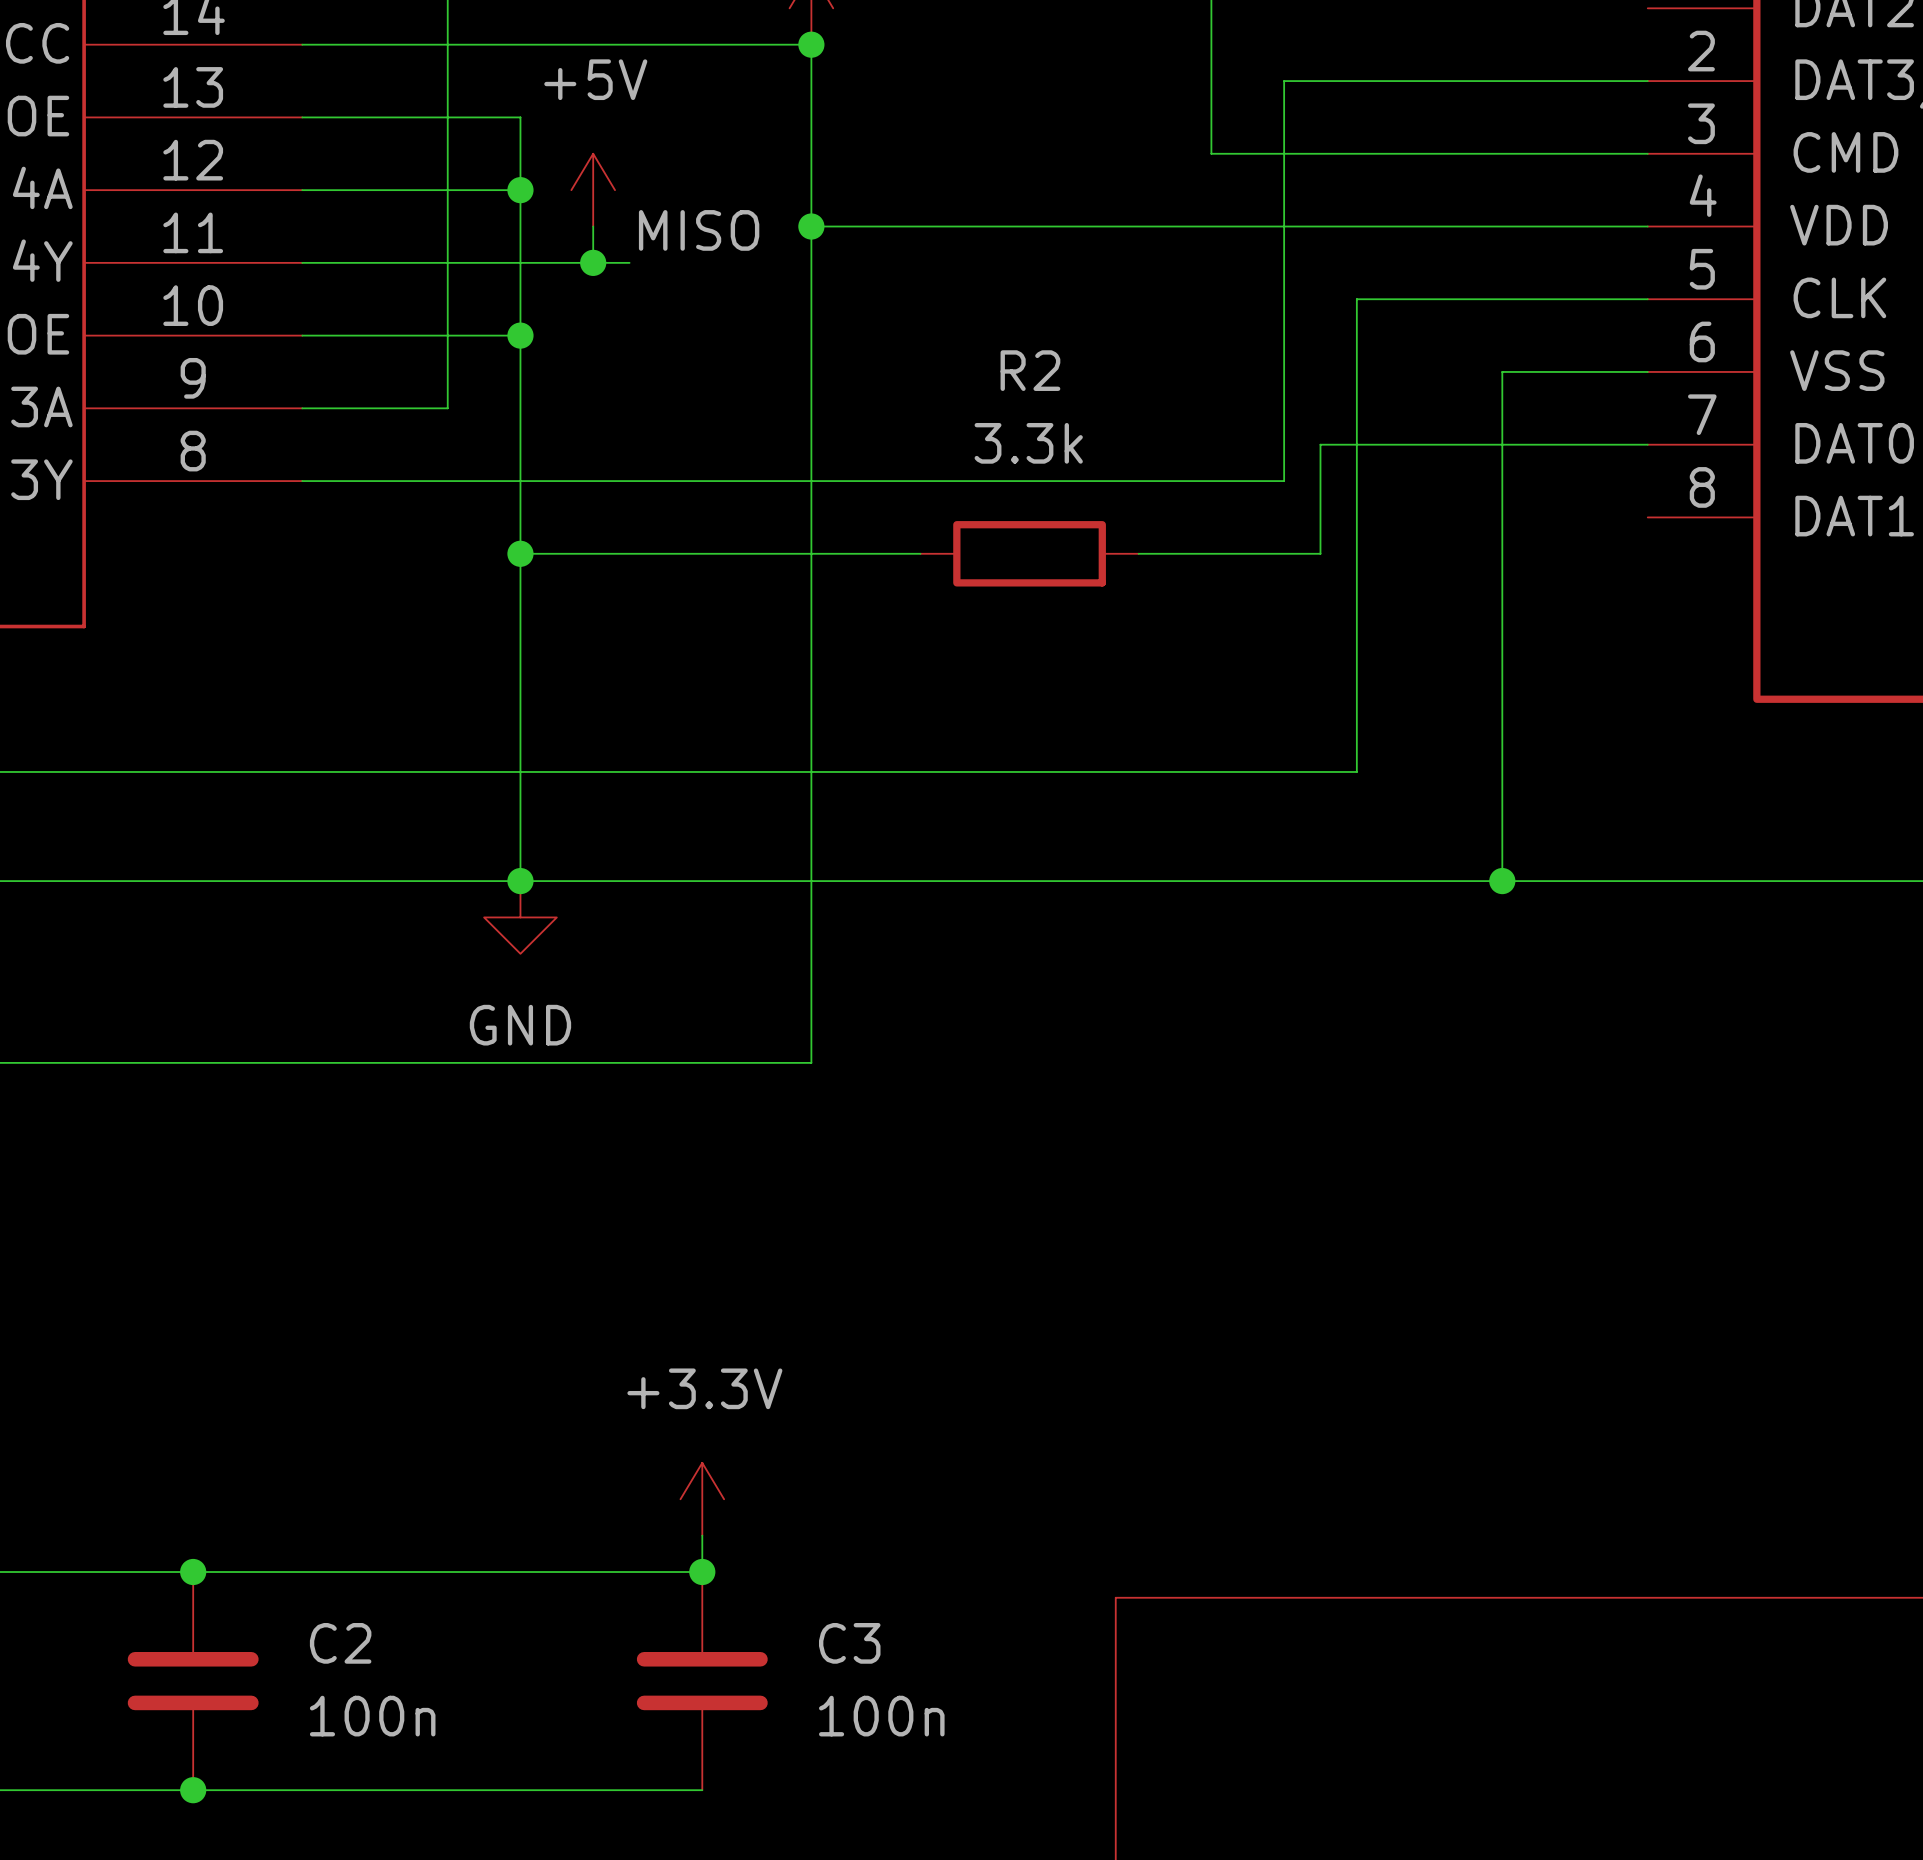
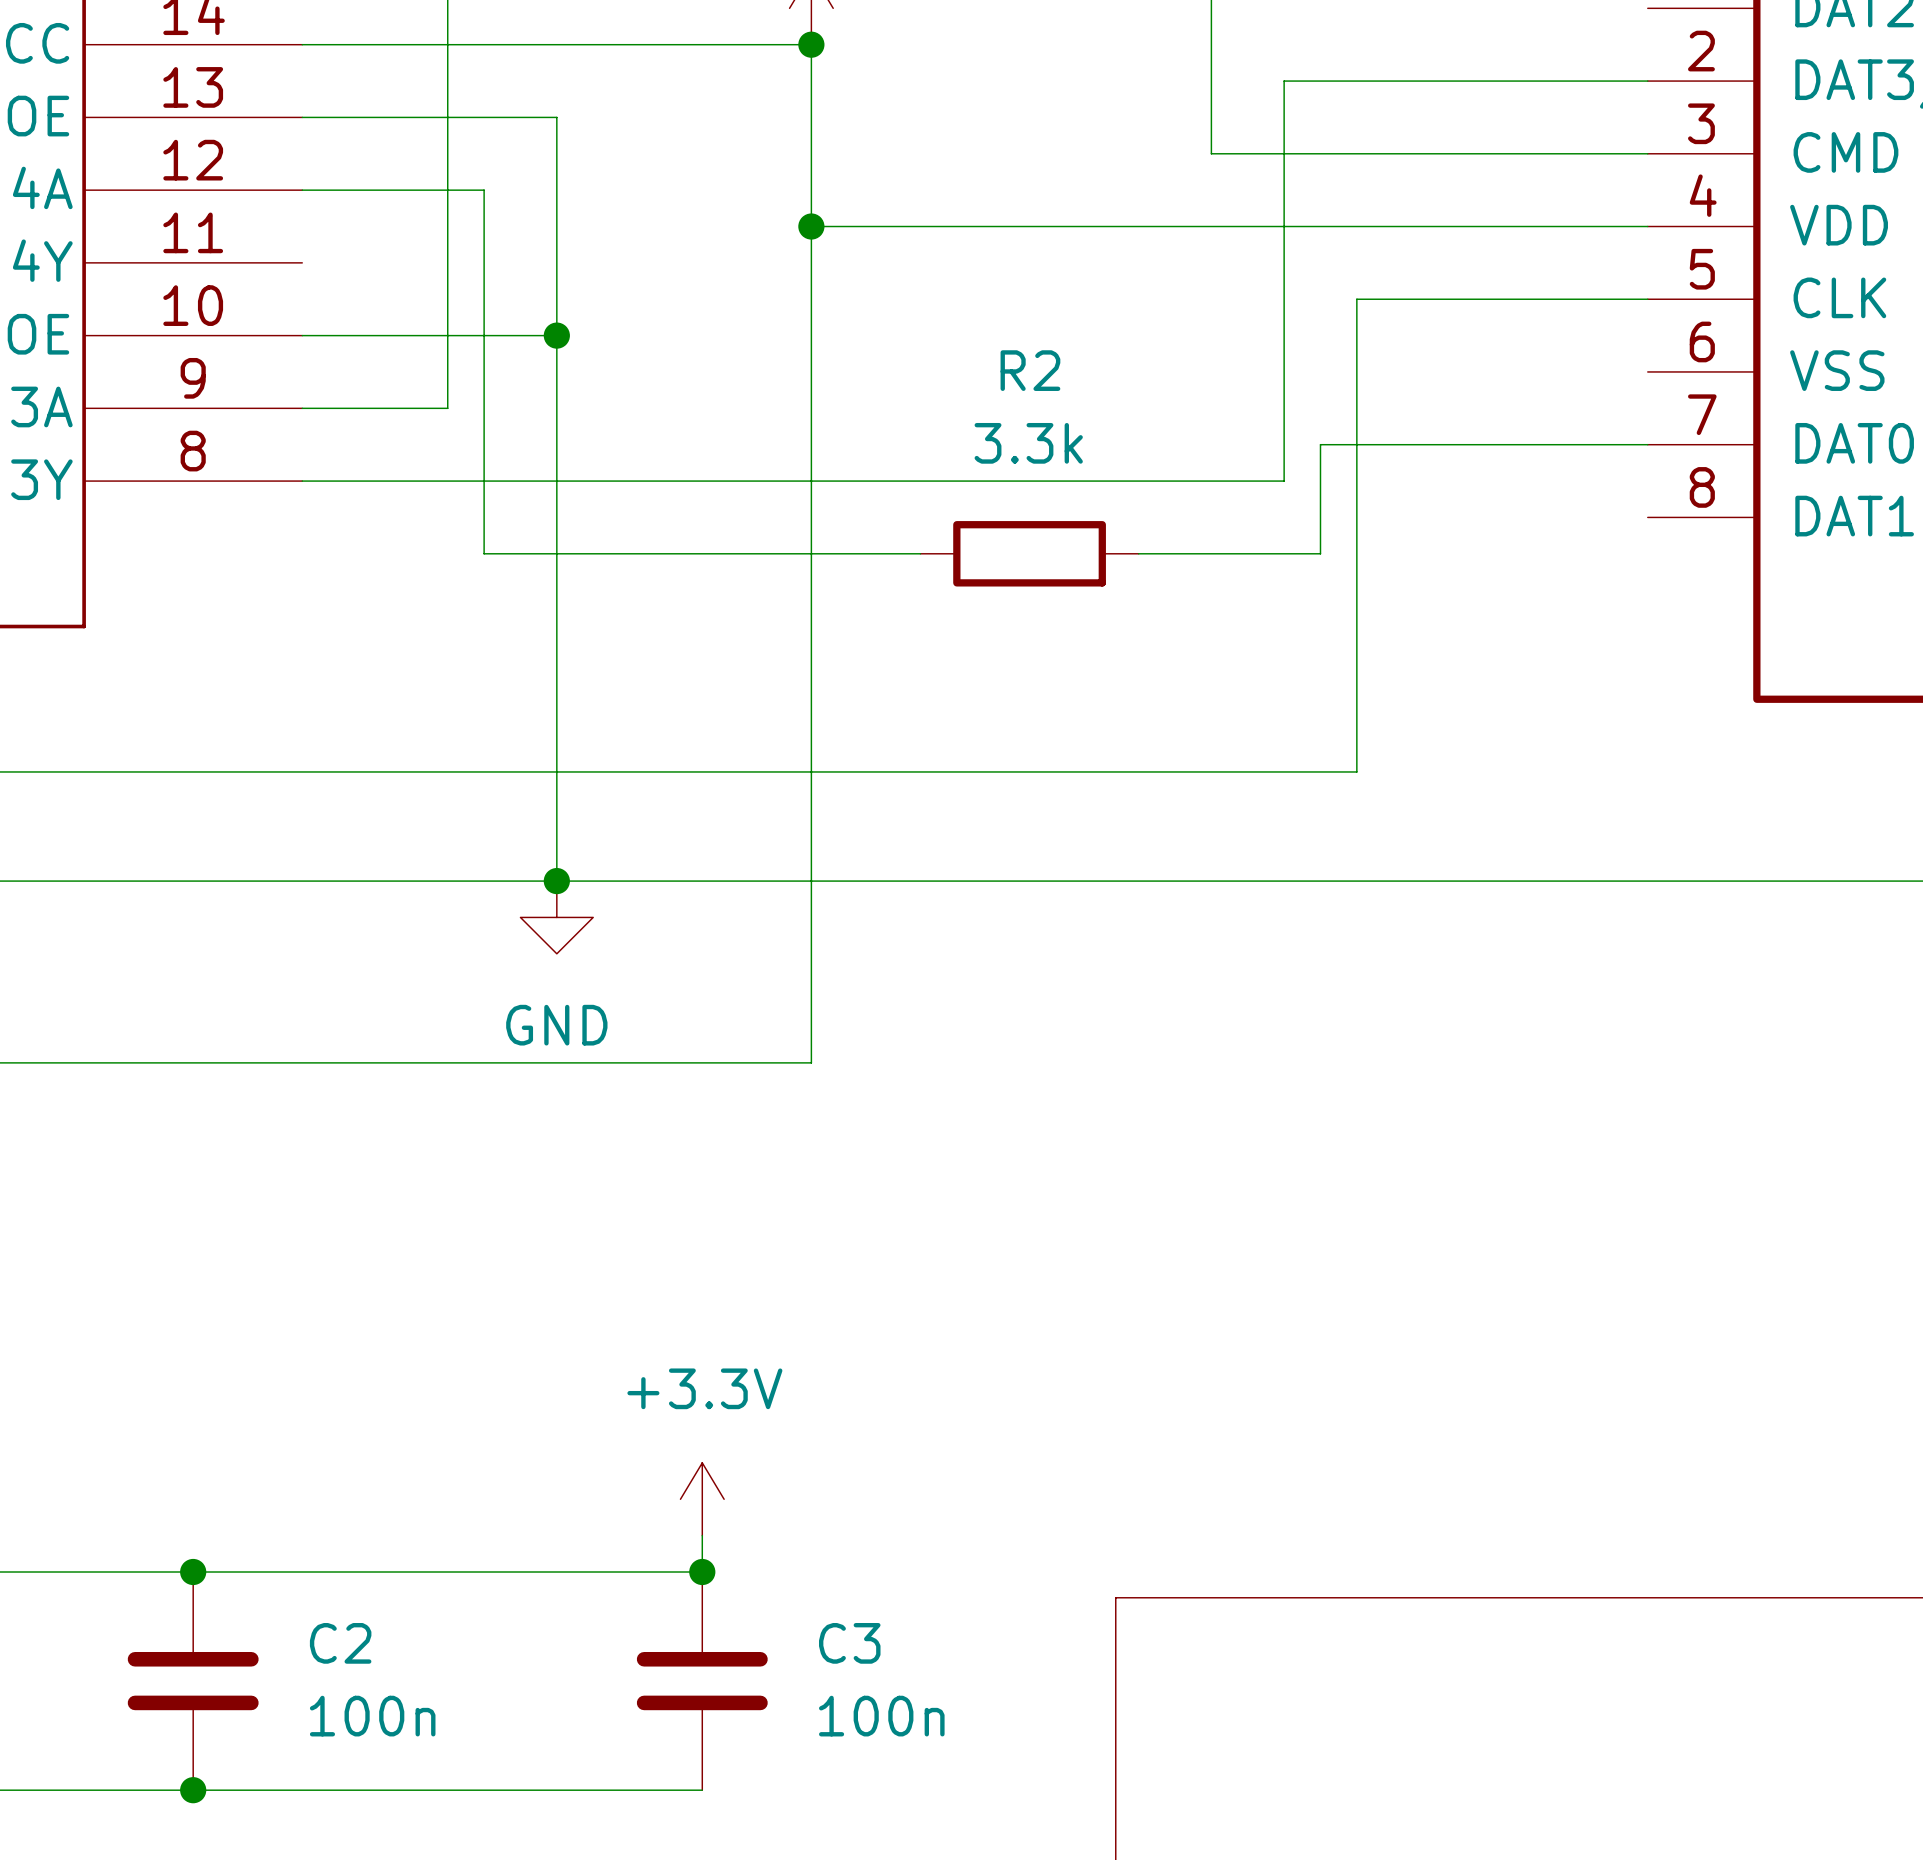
wire: (520, 117) (520, 881) -> (520, 117) (556, 117) (556, 881)
wire: (484, 190) (520, 190) -> (484, 190) (484, 553) (520, 553)
junction: (520, 190) -> none
power symbol: +5V (593, 190) -> none
wire: (593, 226) (593, 262) -> none
label: MISO (699, 230) -> none
wire: (302, 262) (629, 262) -> none
junction: (593, 262) -> none
wire: none -> (520, 335) (556, 335)
junction position: (520, 335) -> (556, 335)
wire: (1647, 371) (1502, 371) (1502, 881) -> none
junction: (520, 553) -> none
junction position: (520, 881) -> (556, 881)
junction: (1502, 881) -> none
power symbol position: GND (520, 917) -> GND (556, 917)

